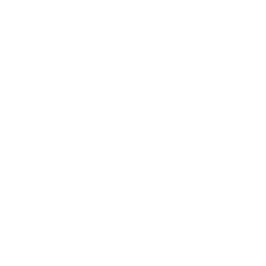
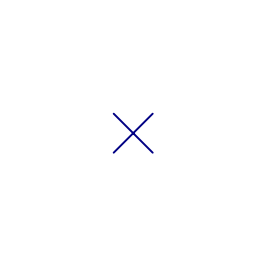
no-connect mark: none -> (133, 133)

